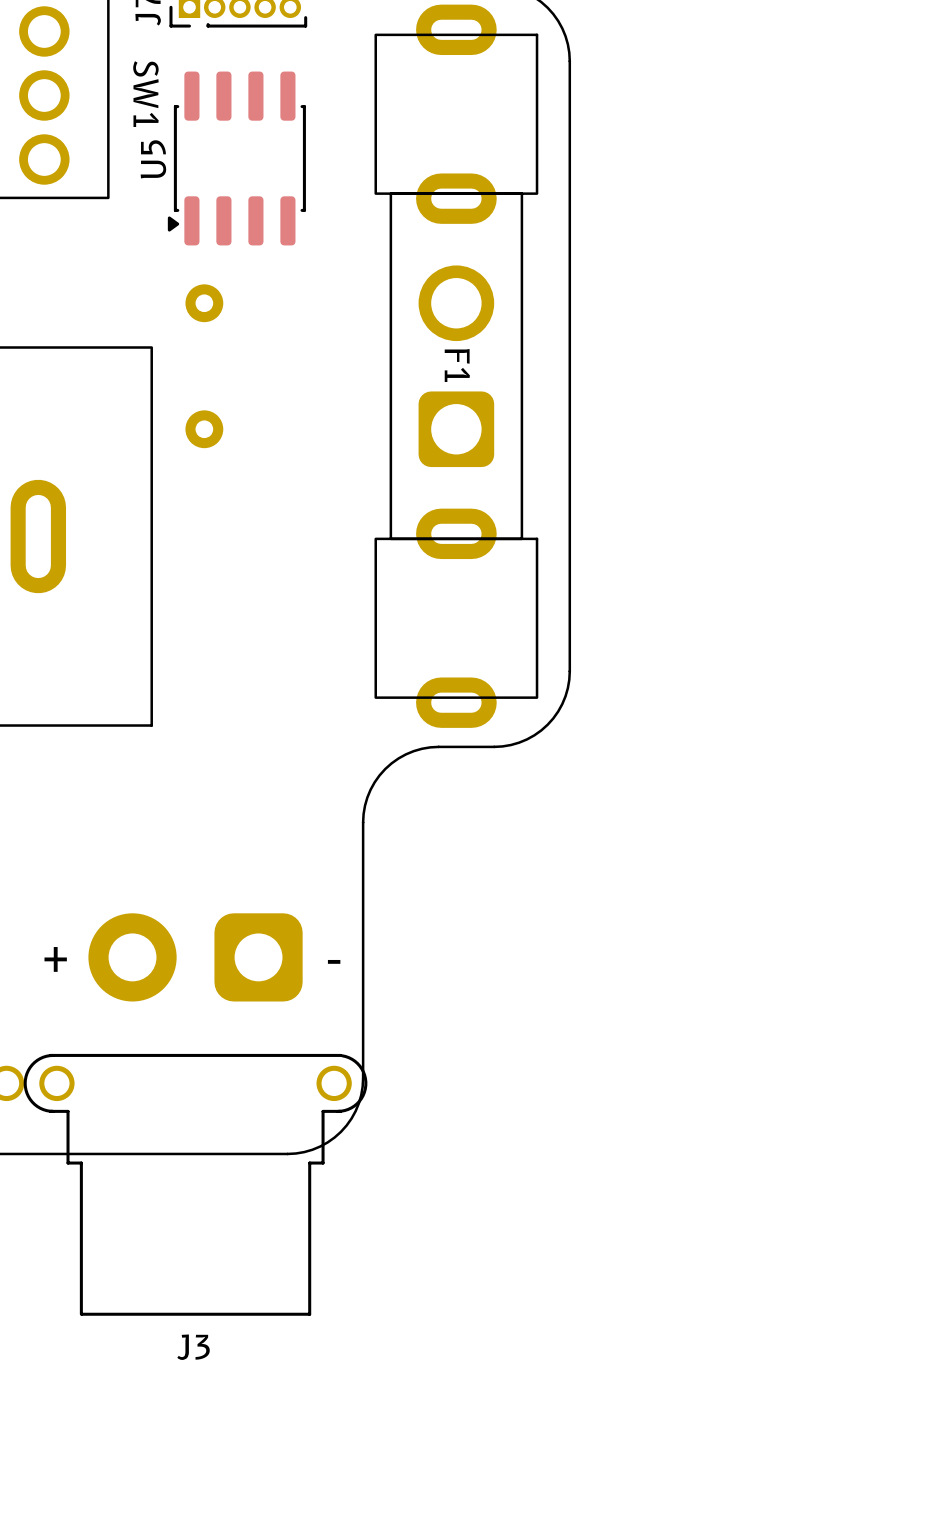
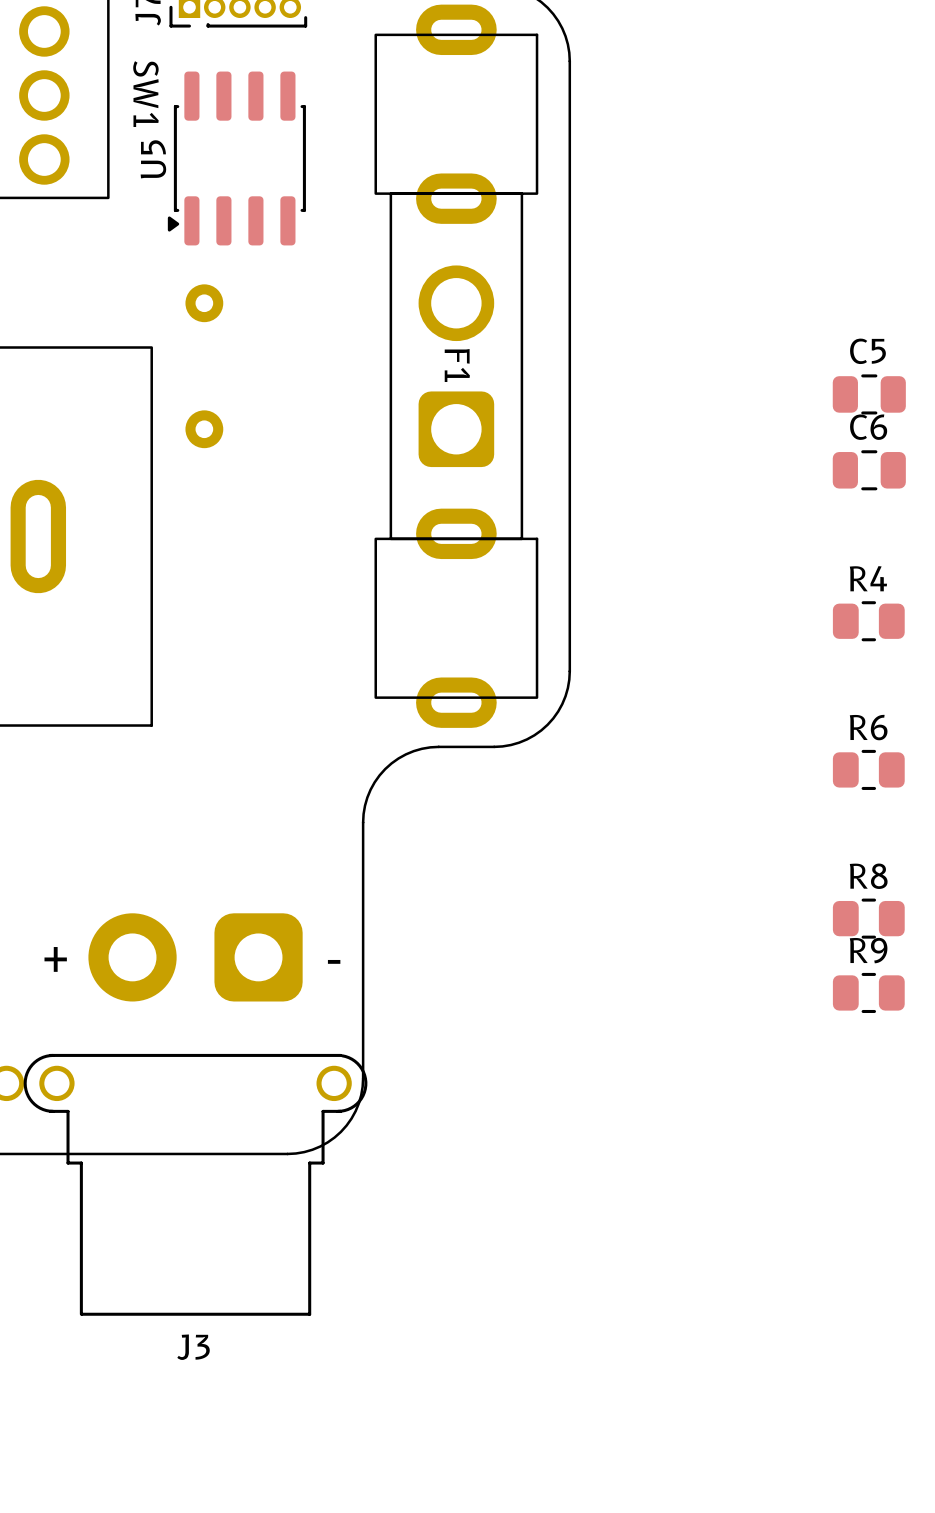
C5: none -> (869, 394)
C6: none -> (869, 470)
R4: none -> (868, 621)
R6: none -> (868, 769)
R8: none -> (868, 918)
R9: none -> (868, 992)

